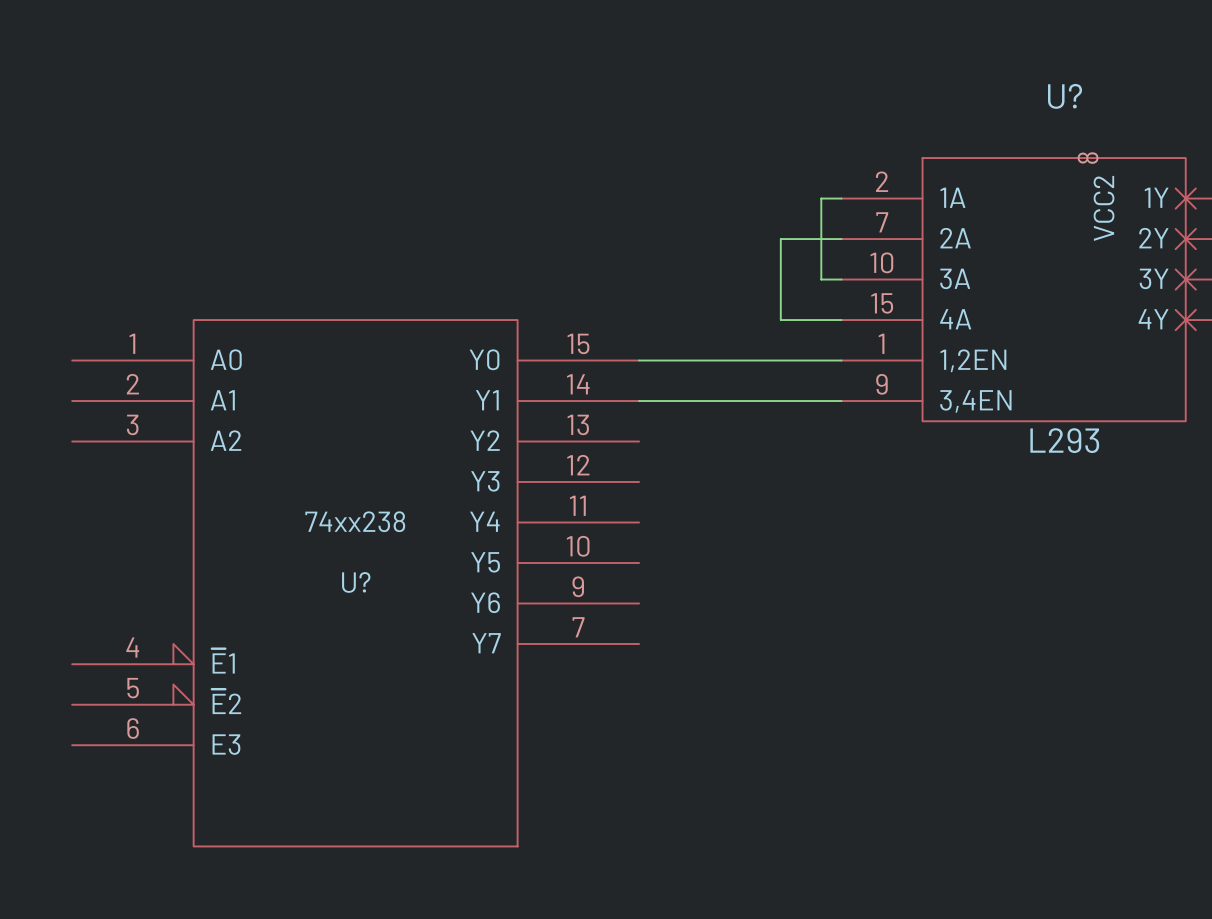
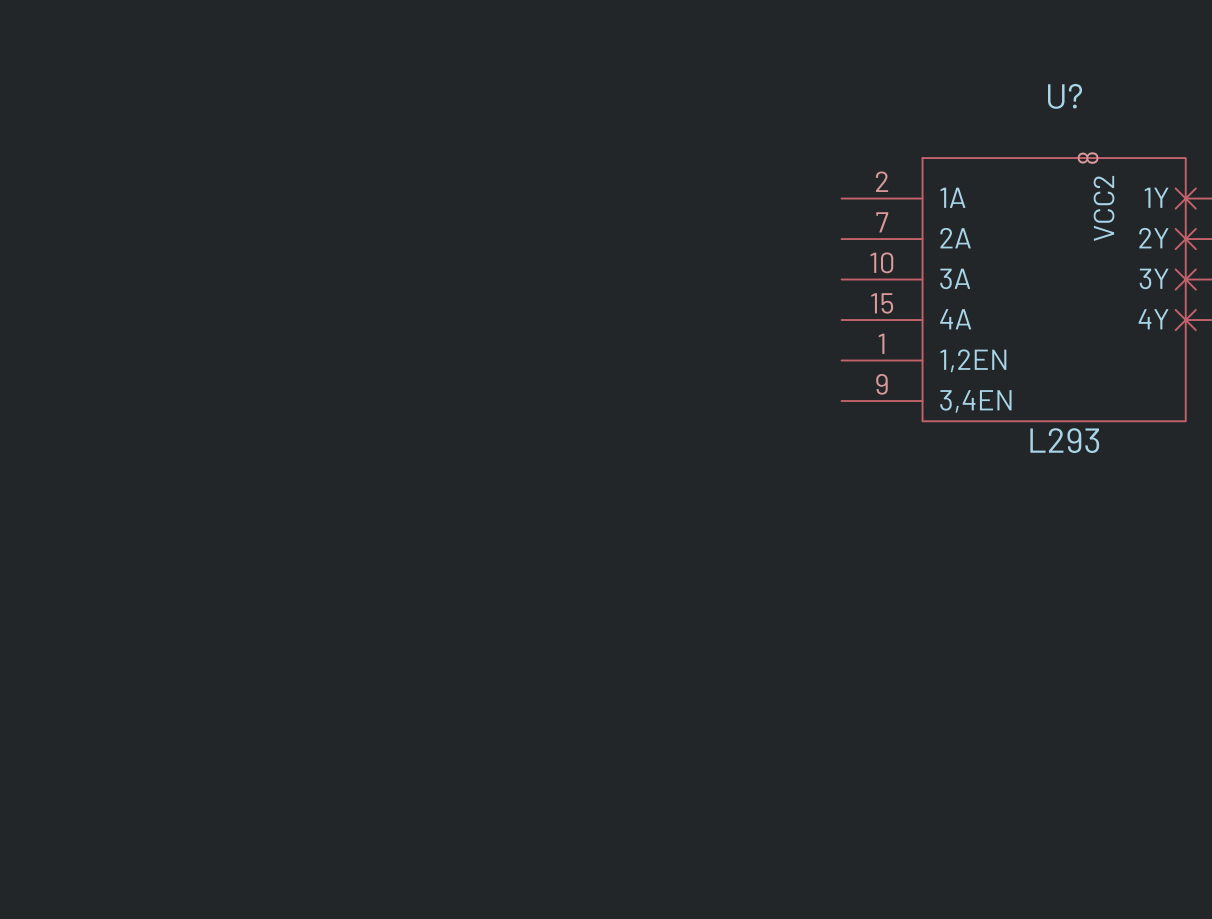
wire: (841, 198) (821, 198) (821, 279) (841, 279) -> none
wire: (841, 239) (780, 239) (780, 320) (841, 320) -> none
wire: (639, 360) (841, 360) -> none
wire: (639, 401) (841, 401) -> none
U?: 74xx238 (355, 583) -> none

